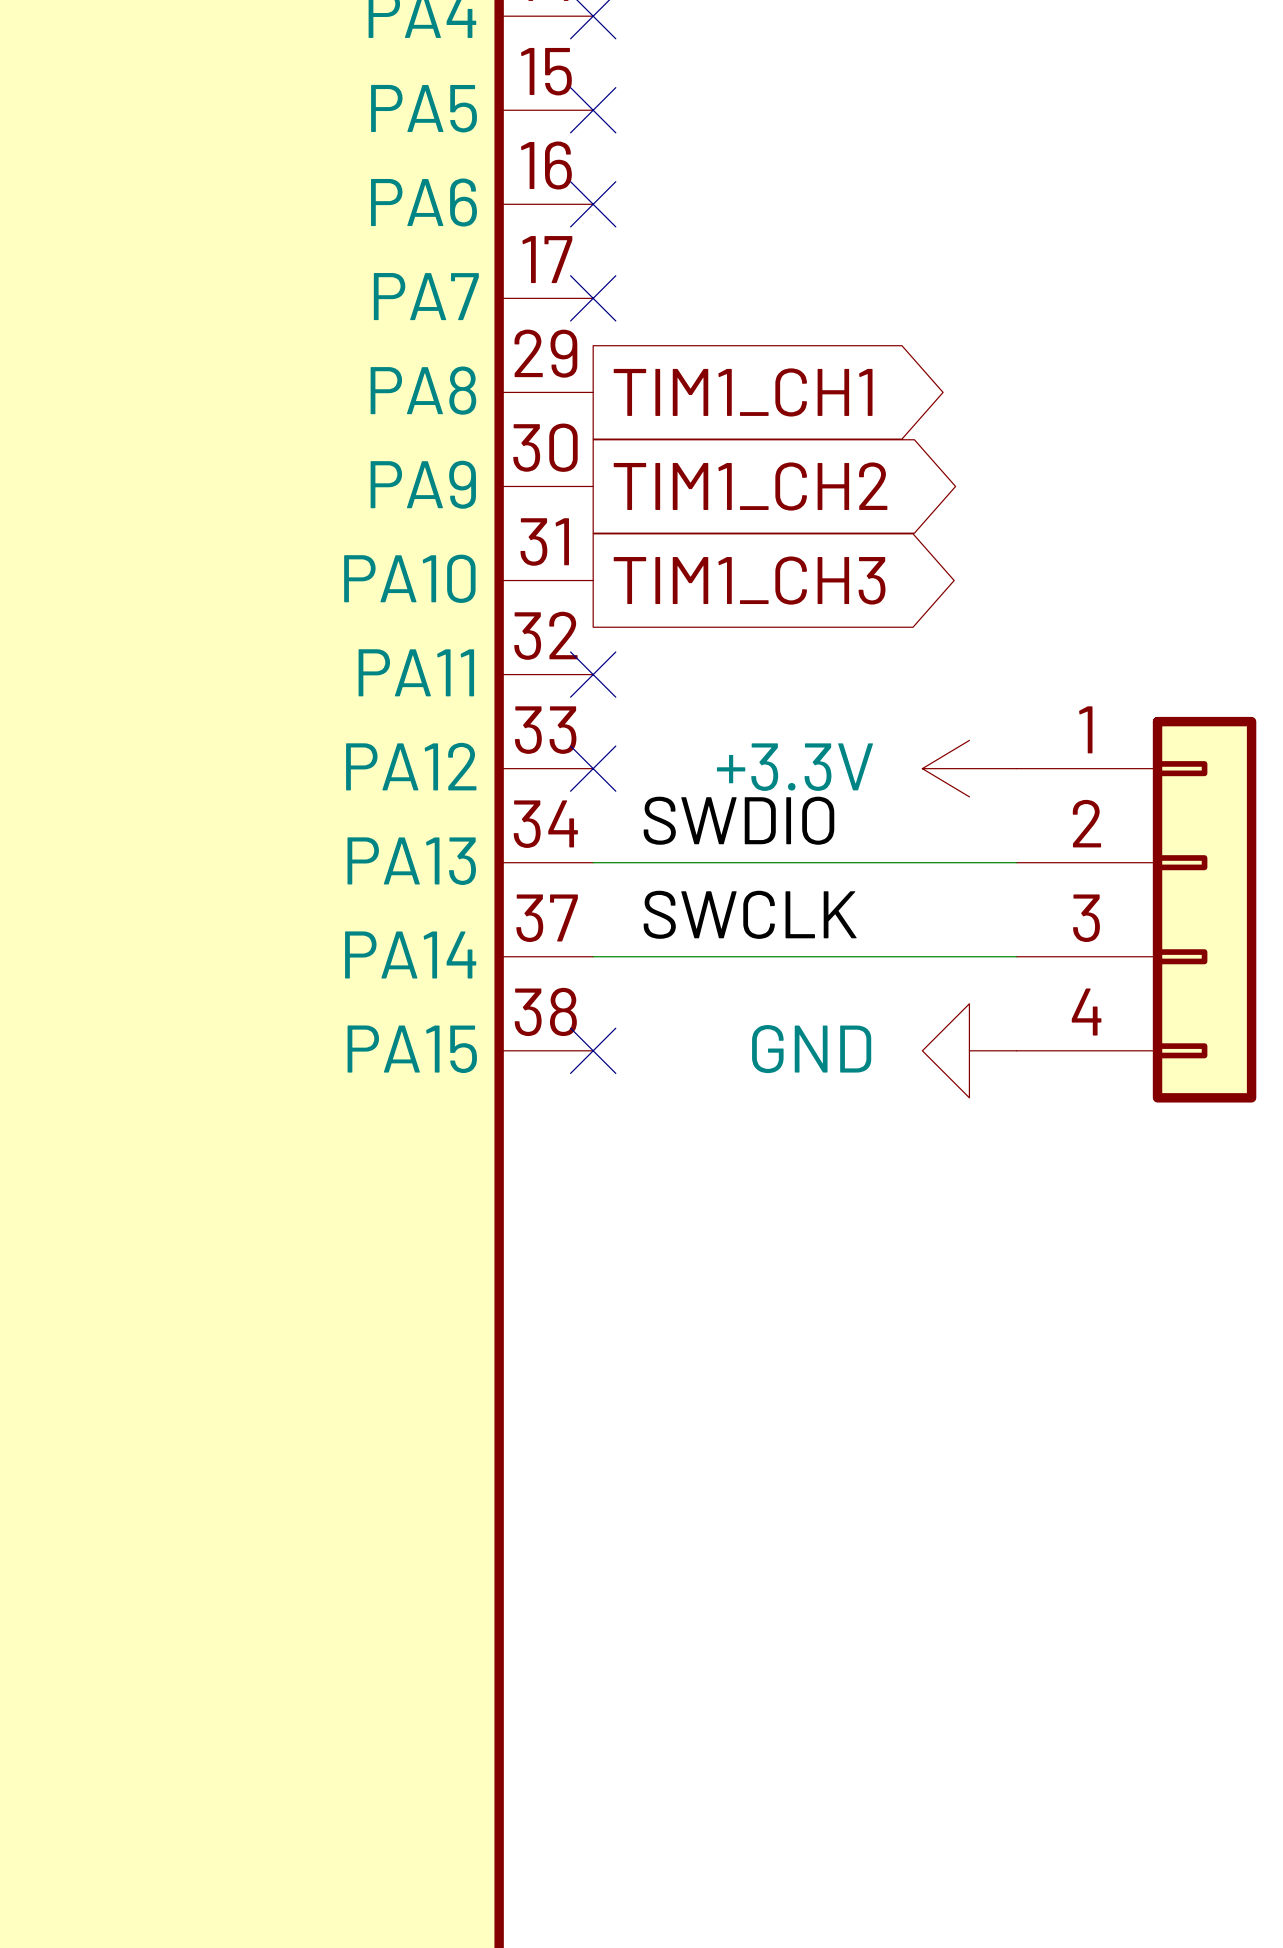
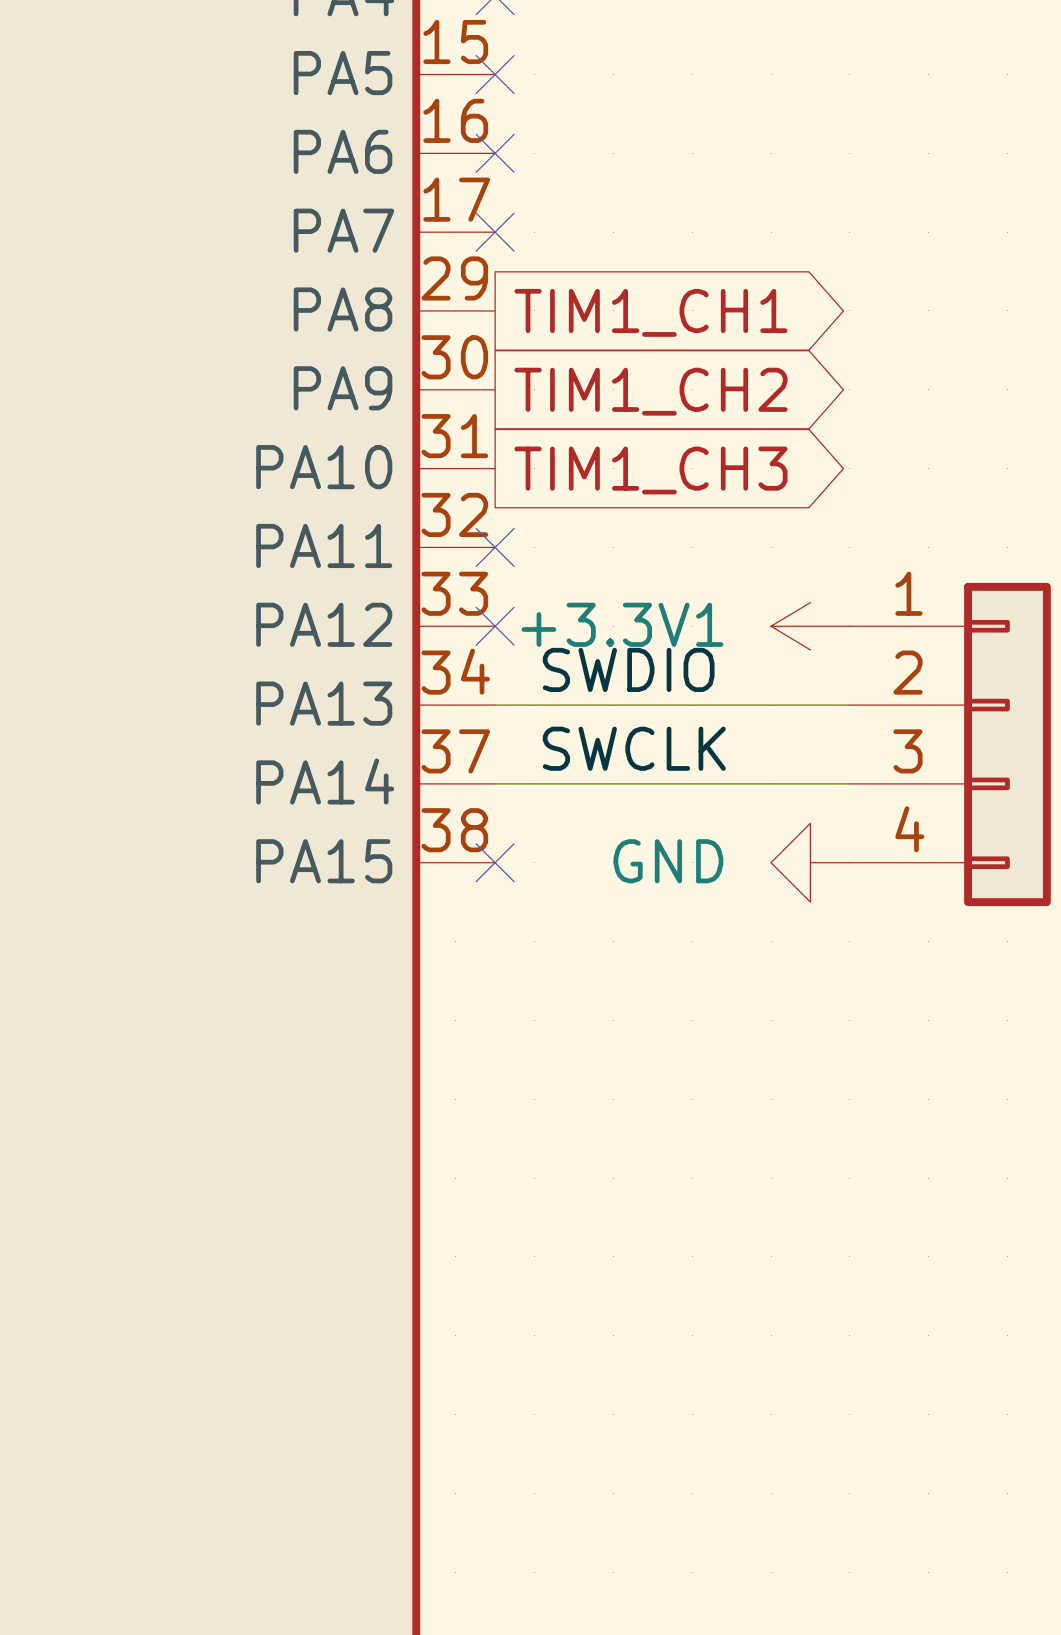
power symbol: +3.3V (969, 768) -> +3.3V1 (810, 626)

